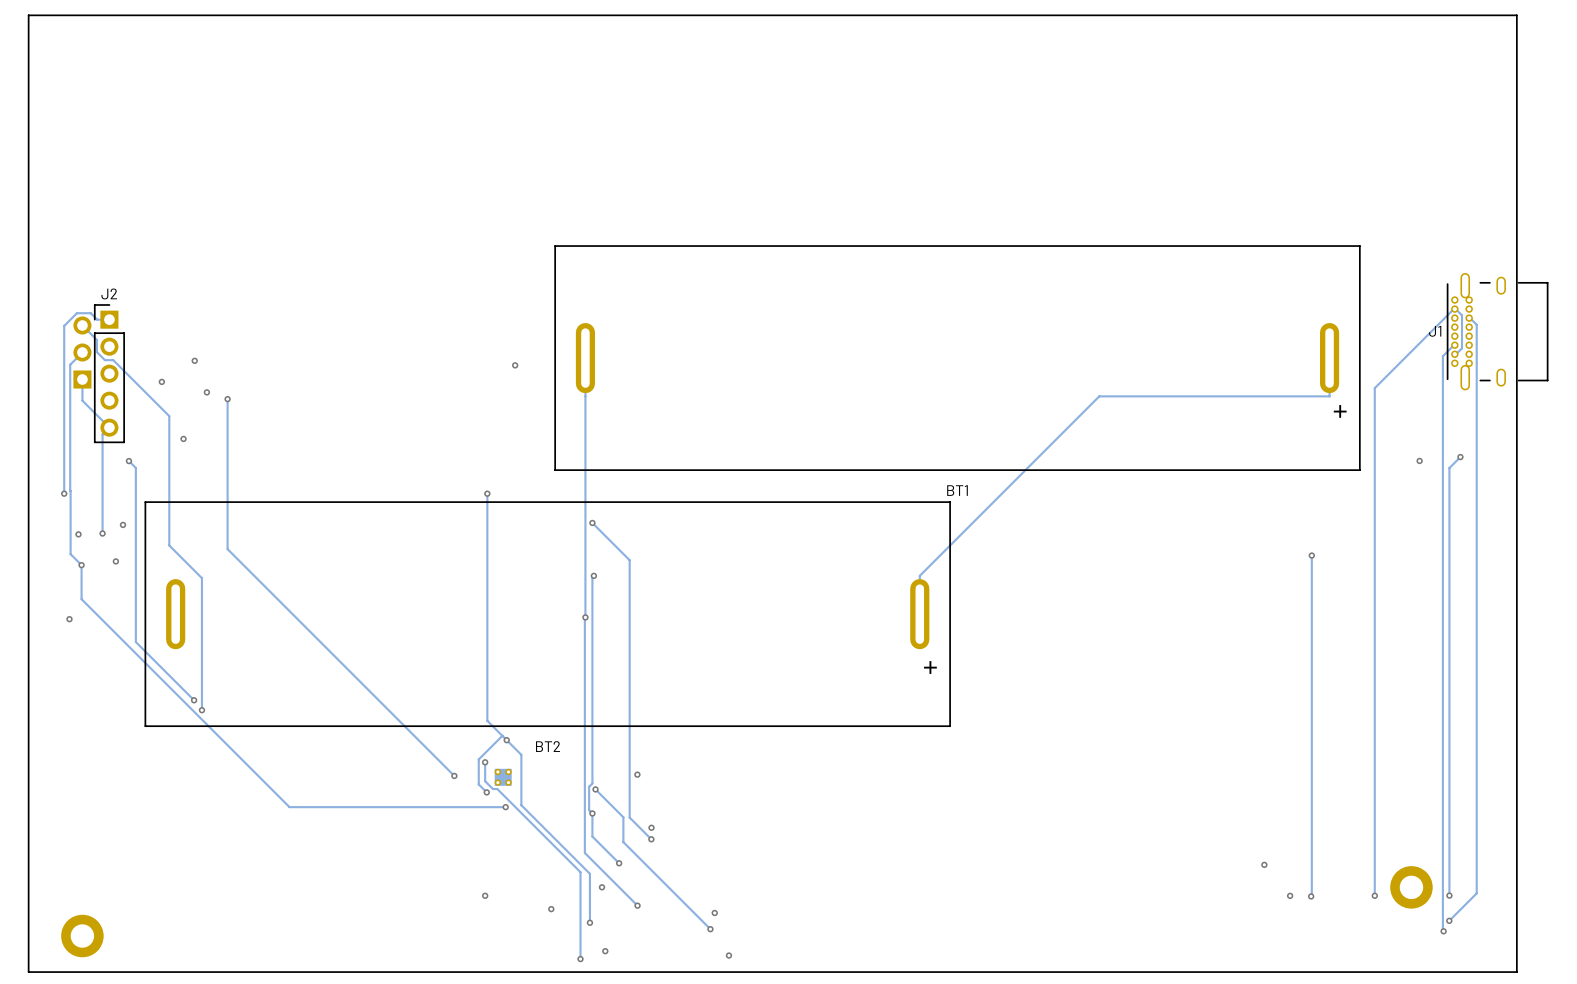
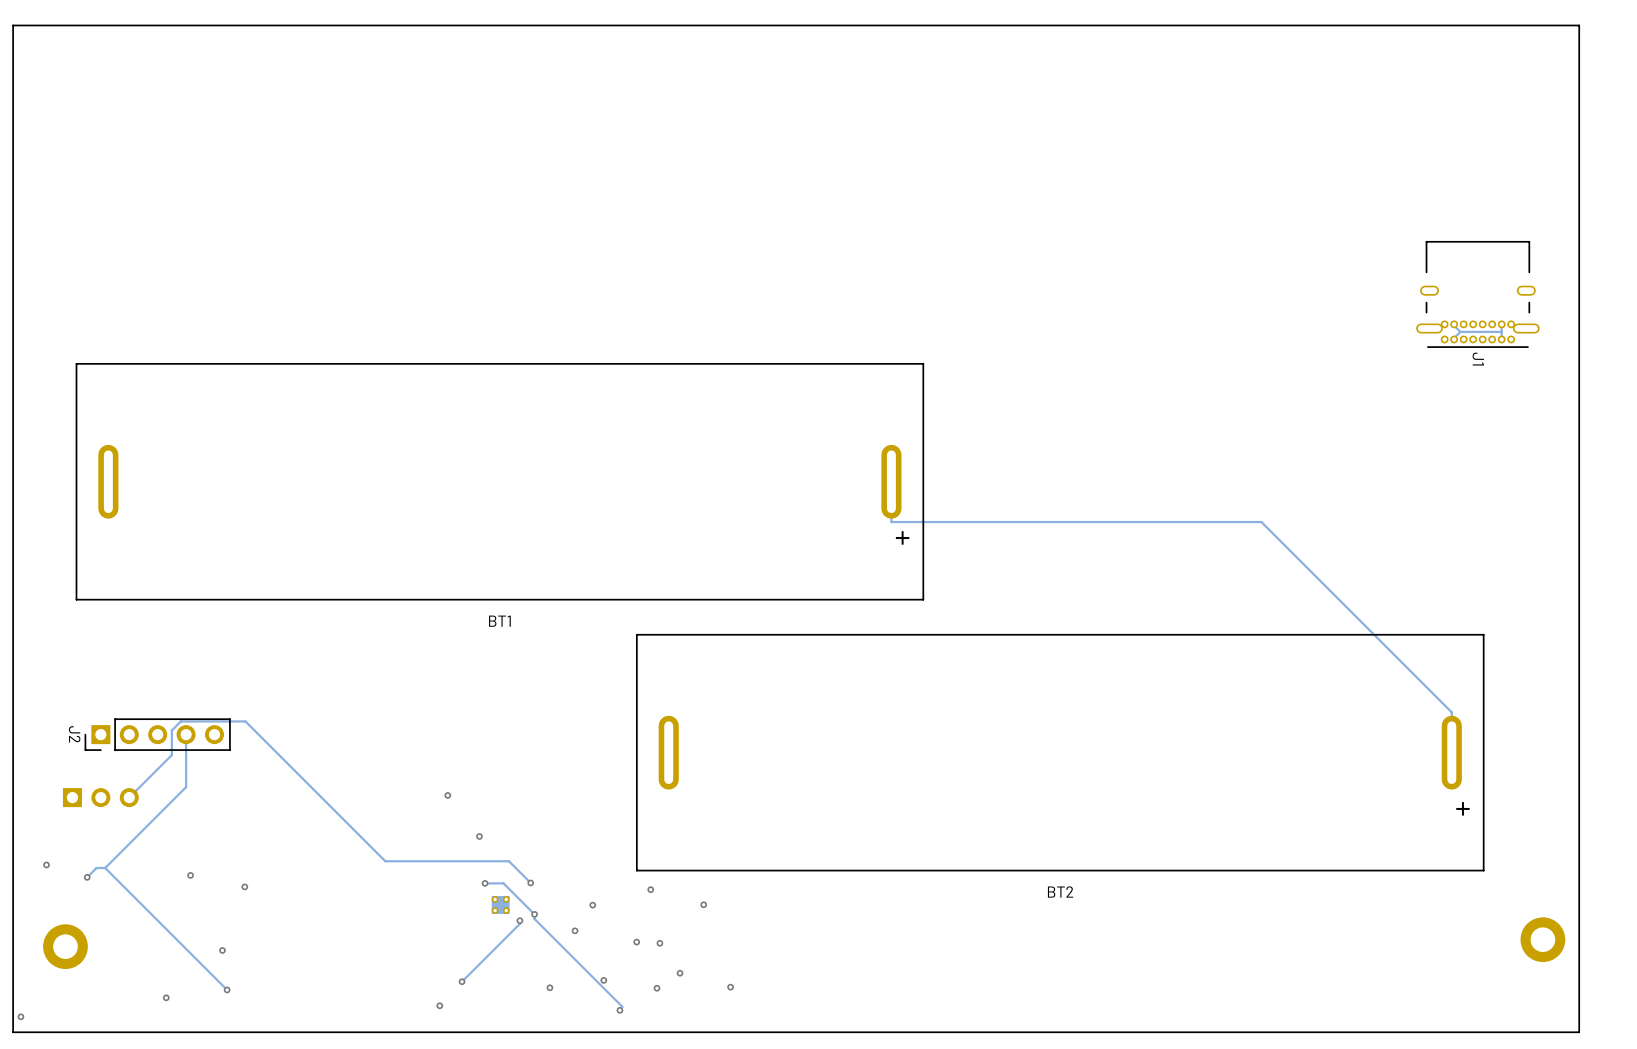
track: none -> (1454, 324) (1460, 331)
track: none -> (1501, 324) (1501, 339)
track: none -> (1460, 331) (1454, 339)
track: none -> (1501, 331) (1460, 331)
track: (1469, 318) (1476, 324) (1476, 893) (1449, 920) -> none
track: (109, 319) (97, 319) (90, 313) (76, 313) (64, 325) (64, 493) -> none
track: (82, 325) (96, 339) (96, 352) (104, 360) (113, 360) (169, 416) (169, 545) (201, 578) (201, 710) -> none
J1 rotation: 0° (1497, 331) -> 90° counterclockwise (1477, 294)
J1 position: (1497, 331) -> (1477, 294)
track: (1454, 345) (1442, 356) (1443, 931) -> none
track: (82, 352) (70, 364) (70, 554) (81, 565) (81, 599) (289, 807) (505, 807) -> none
part: (82, 352) -> none
track: (1454, 354) (1461, 348) (1461, 315) (1453, 309) (1374, 388) (1374, 895) -> none
track: (585, 358) (584, 853) (637, 905) -> none
BT1 position: (957, 358) -> (499, 481)
track: (1329, 358) (1329, 396) (1099, 396) (919, 575) (919, 614) -> none
via: (194, 360) -> none
via: (515, 365) -> none
J2 rotation: 0° (109, 373) -> 90° counterclockwise (157, 734)
J2 position: (109, 373) -> (157, 734)
track: (82, 379) (82, 400) (109, 427) (102, 434) (102, 533) -> none
via: (161, 381) -> none
via: (206, 392) -> none
track: (227, 399) (227, 549) (454, 775) -> none
via: (227, 399) -> none
via: (183, 438) -> none
track: none -> (891, 481) (891, 522) (1261, 522) (1451, 712) (1451, 752)
track: (1460, 457) (1449, 468) (1449, 895) -> none
via: (1460, 457) -> none
via: (1419, 460) -> none
track: (128, 461) (135, 467) (135, 642) (194, 700) -> none
via: (128, 461) -> none
via: (64, 493) -> none
track: (487, 493) (487, 720) (521, 754) (521, 805) (589, 873) (589, 922) -> none
via: (487, 493) -> none
track: (592, 522) (629, 560) (629, 817) (651, 839) -> none
via: (592, 522) -> none
via: (123, 524) -> none
via: (102, 533) -> none
via: (78, 534) -> none
track: (1311, 555) (1311, 896) -> none
via: (1311, 555) -> none
via: (115, 561) -> none
via: (81, 565) -> none
track: (593, 575) (592, 783) (589, 786) (589, 810) (592, 813) (592, 836) (619, 863) -> none
via: (593, 575) -> none
BT2 position: (547, 614) -> (1060, 752)
via: (585, 617) -> none
via: (69, 619) -> none
track: none -> (186, 734) (186, 787) (105, 868)
via: (194, 700) -> none
via: (201, 710) -> none
track: (502, 735) (478, 759) (478, 784) (486, 792) -> none
via: (506, 740) -> none
via: none -> (447, 795)
part: none -> (100, 797)
track: none -> (129, 797) (171, 754) (171, 730) (180, 721) (245, 721) (385, 861) (508, 861) (530, 882)
track: (485, 762) (485, 781) (492, 789) (497, 789) (580, 872) (580, 959) -> none
via: (485, 762) -> none
via: (637, 774) -> none
via: (454, 775) -> none
part position: (503, 777) -> (500, 904)
via: none -> (479, 836)
track: (595, 789) (623, 817) (623, 842) (710, 929) -> none
via: (595, 789) -> none
via: (486, 792) -> none
via: (505, 807) -> none
via: none -> (46, 864)
via: (592, 813) -> none
track: none -> (105, 868) (227, 989)
track: none -> (105, 868) (96, 868) (87, 877)
via: none -> (190, 875)
via: none -> (87, 877)
via: (651, 827) -> none
track: none -> (485, 883) (503, 883) (534, 914) (534, 918) (622, 1007)
via: none -> (485, 883)
via: none -> (530, 882)
via: none -> (244, 886)
via: none -> (650, 889)
via: (651, 839) -> none
via: none -> (703, 904)
via: none -> (592, 905)
via: none -> (534, 914)
via: (619, 863) -> none
via: (1264, 864) -> none
track: none -> (519, 920) (519, 923) (462, 981)
via: none -> (519, 920)
via: none -> (575, 930)
via: none -> (636, 942)
via: (602, 887) -> none
via: none -> (659, 943)
part position: (1411, 887) -> (1542, 939)
via: none -> (222, 950)
via: (485, 895) -> none
via: (1290, 895) -> none
via: (1374, 895) -> none
via: (1449, 895) -> none
via: (1311, 896) -> none
via: (637, 905) -> none
via: (551, 909) -> none
via: (714, 912) -> none
via: none -> (680, 973)
via: (1449, 920) -> none
via: none -> (462, 981)
via: none -> (549, 987)
via: none -> (656, 988)
via: none -> (227, 989)
via: (1443, 931) -> none
part position: (82, 936) -> (65, 946)
via: none -> (166, 997)
via: none -> (439, 1005)
via: (728, 955) -> none
via: none -> (20, 1016)
via: (580, 959) -> none

